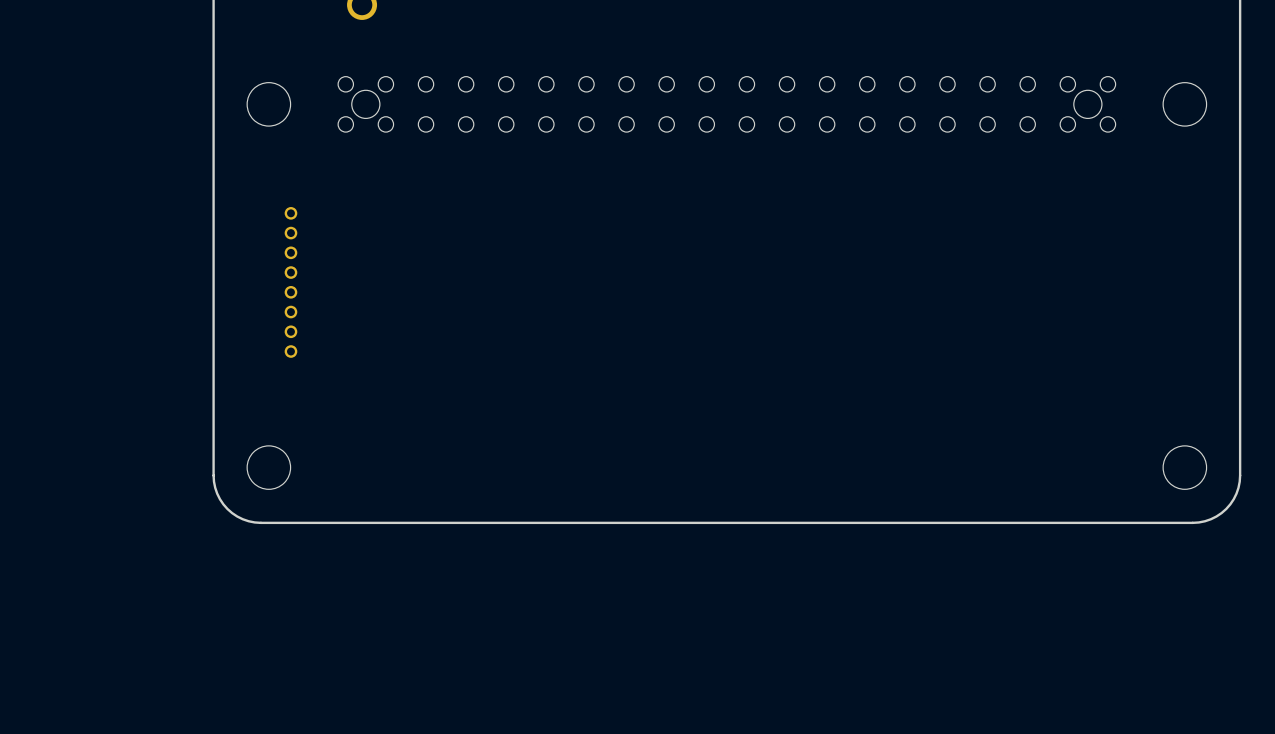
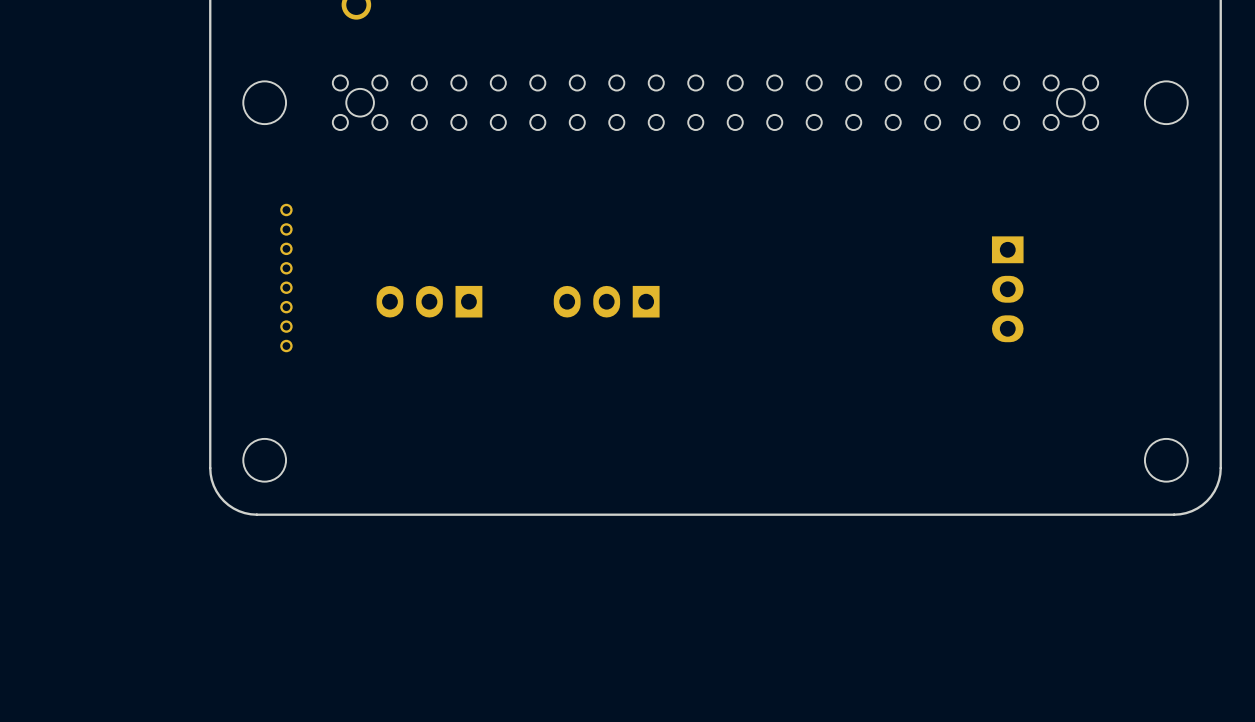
part: none -> (1007, 289)
part: none -> (429, 301)
part: none -> (606, 301)

